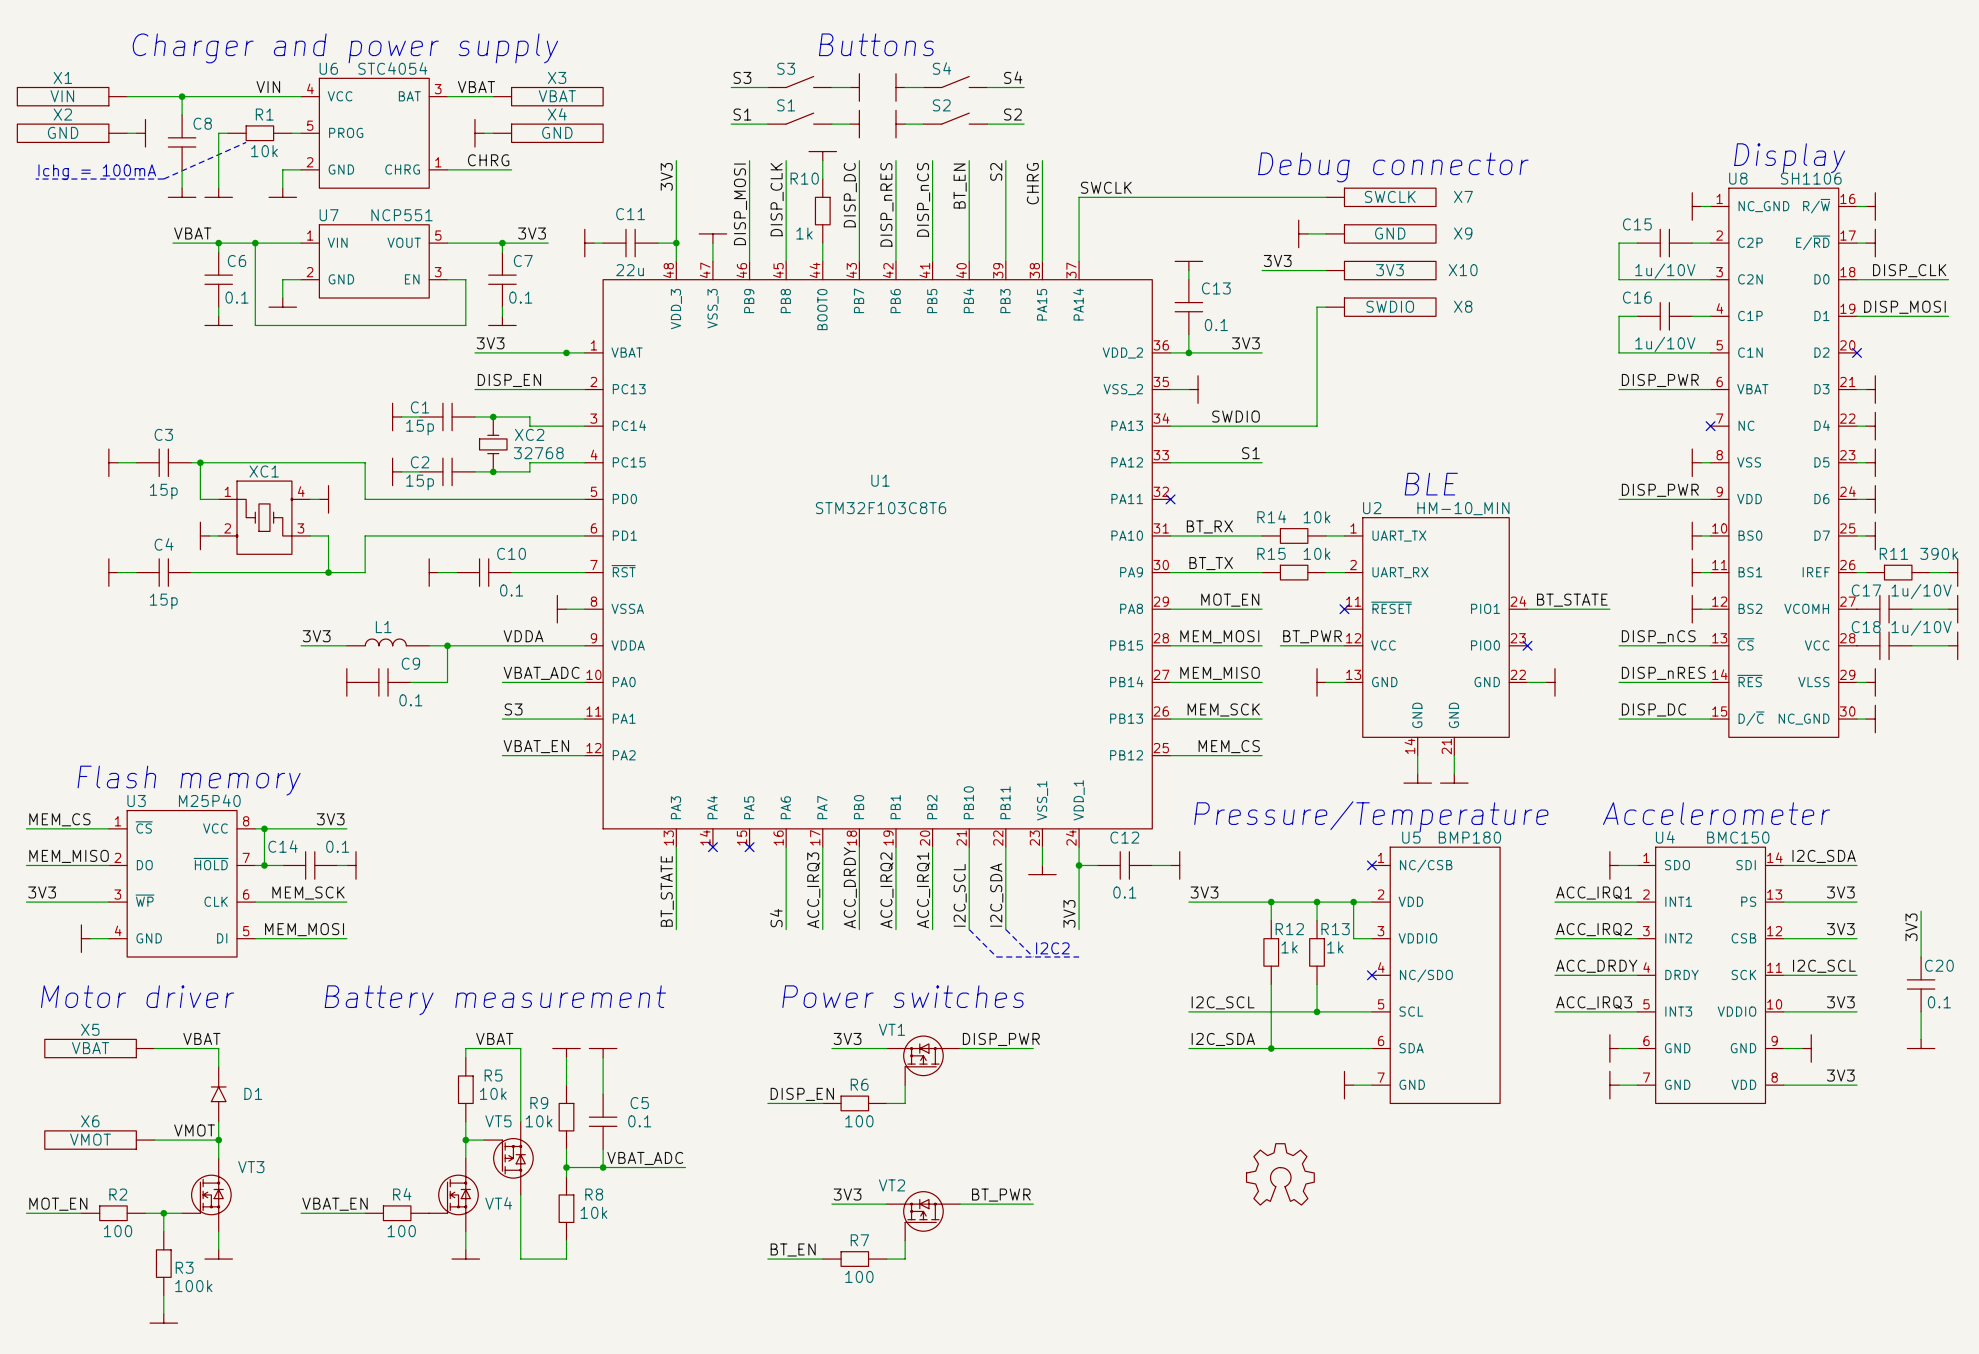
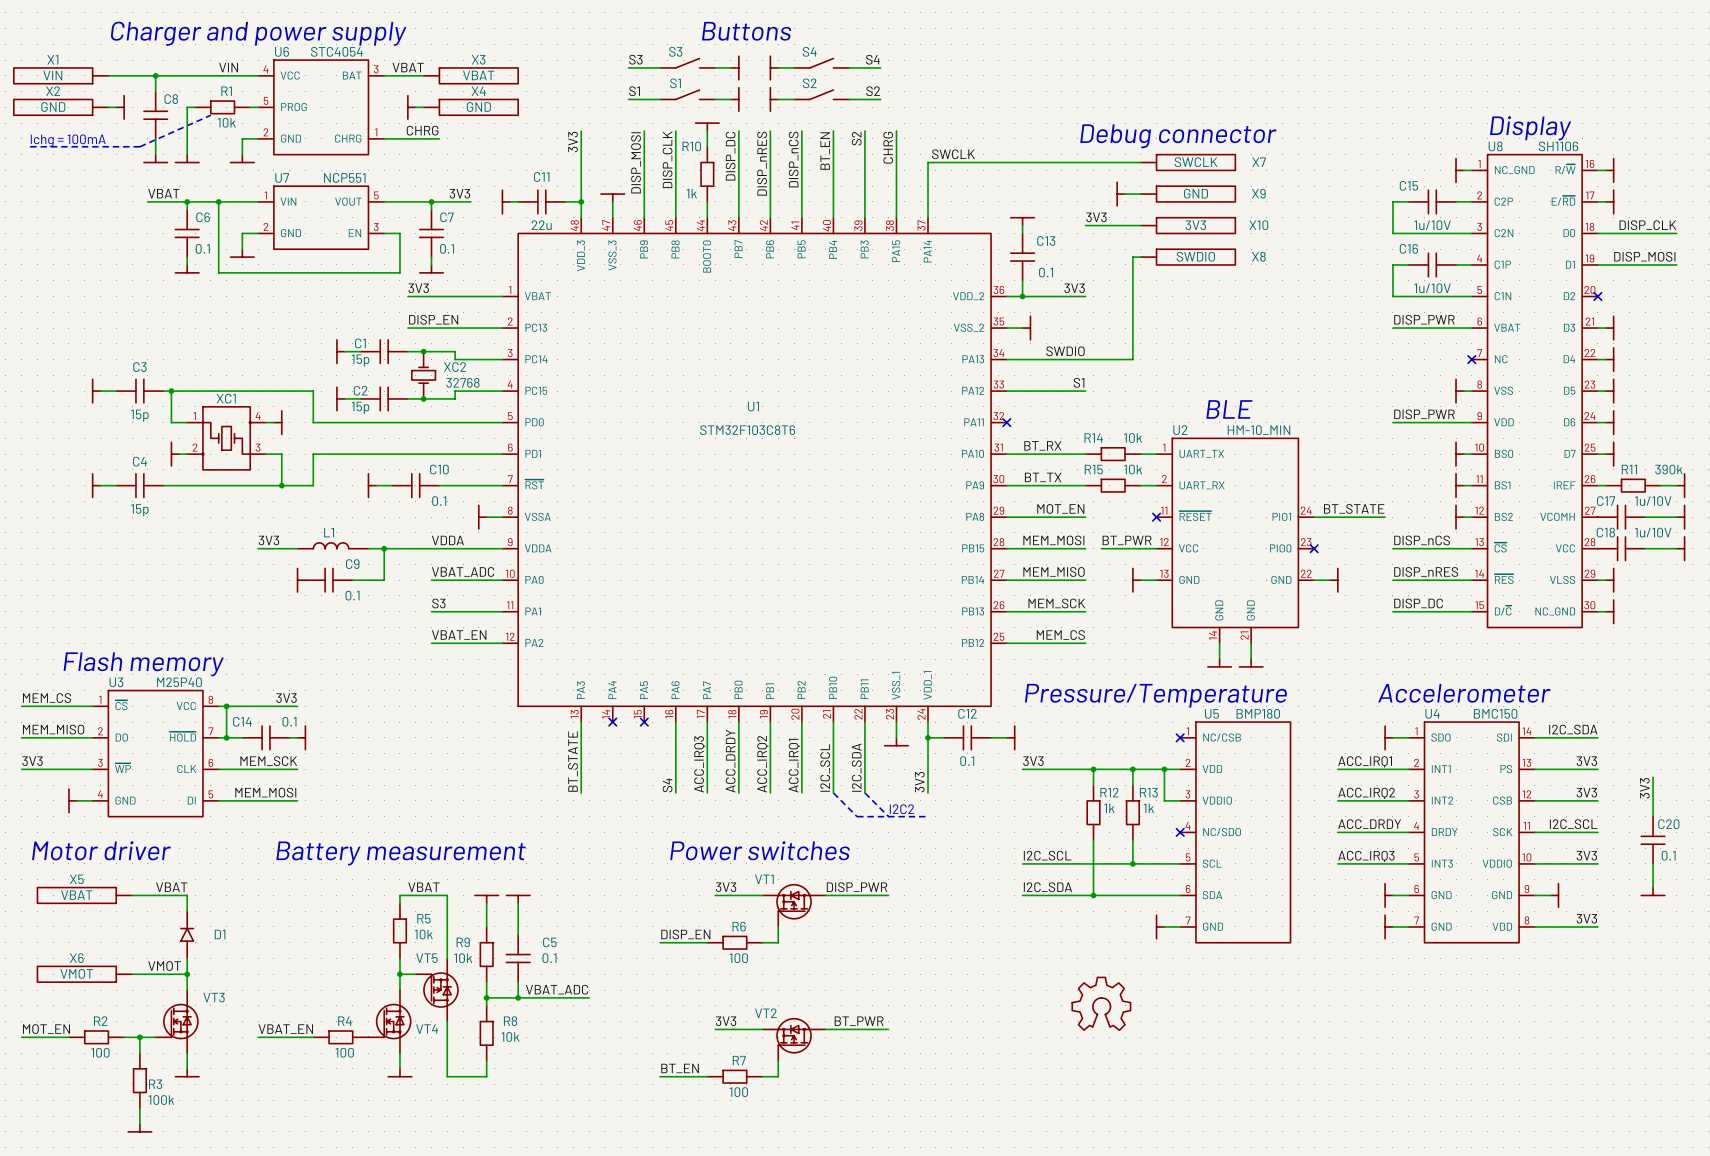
junction: (566, 352) -> none

